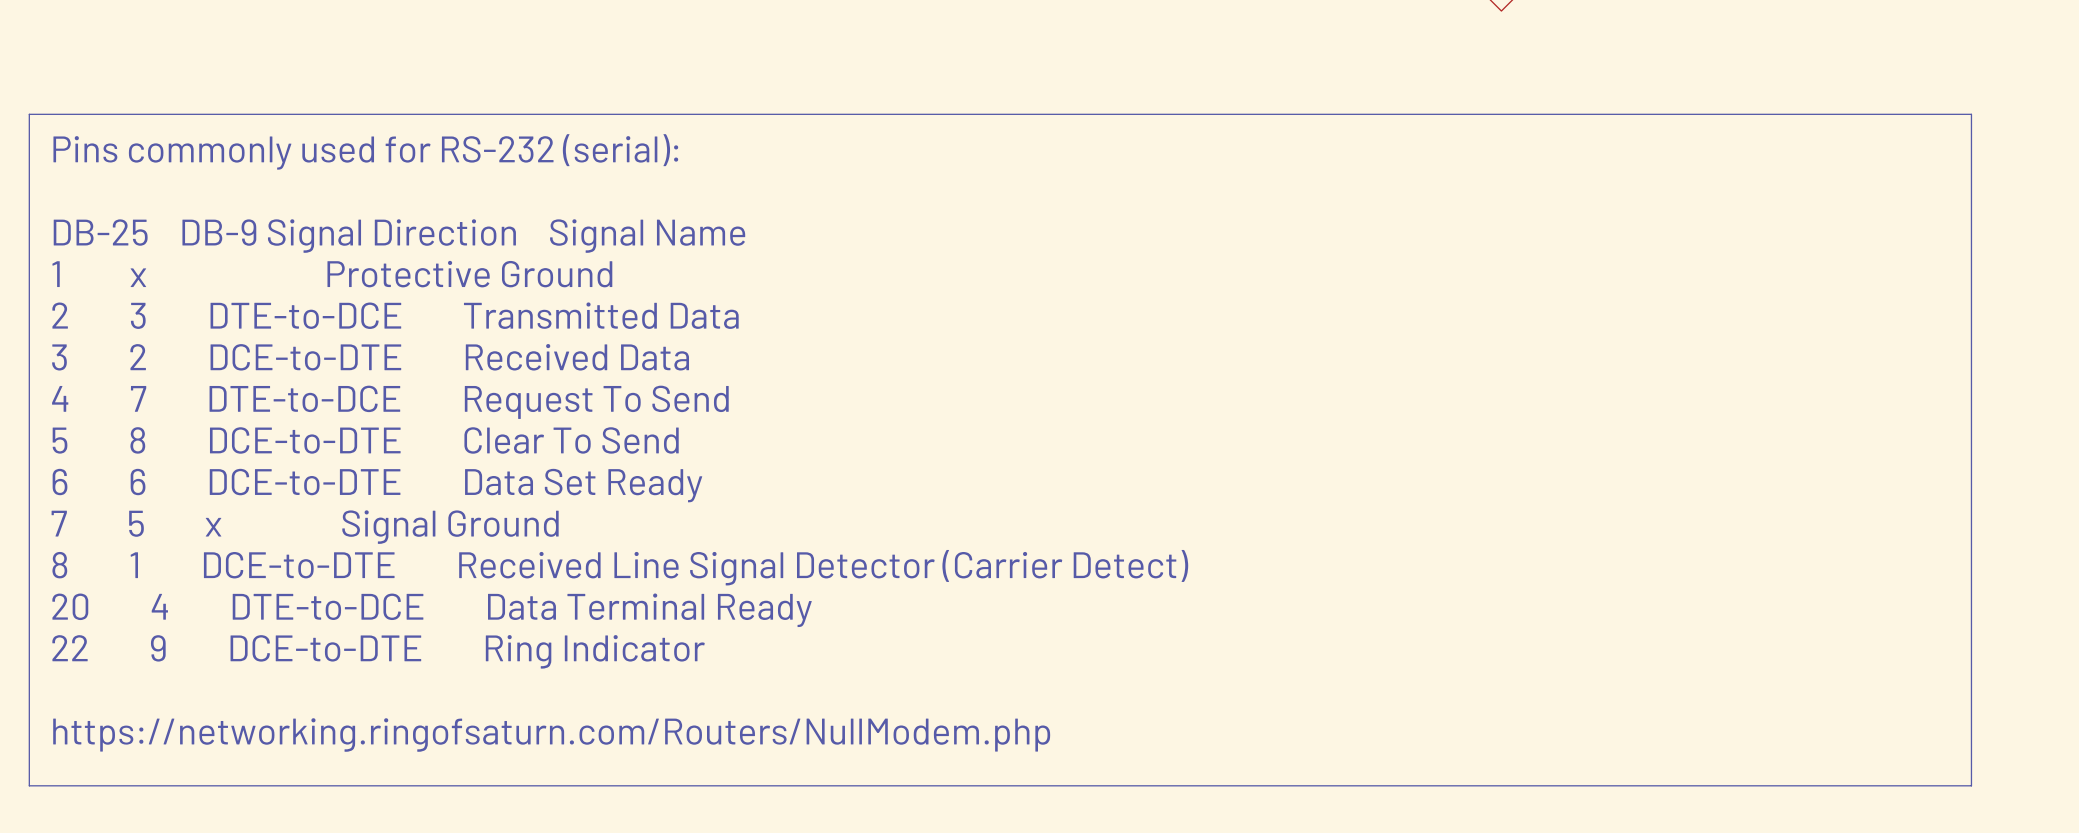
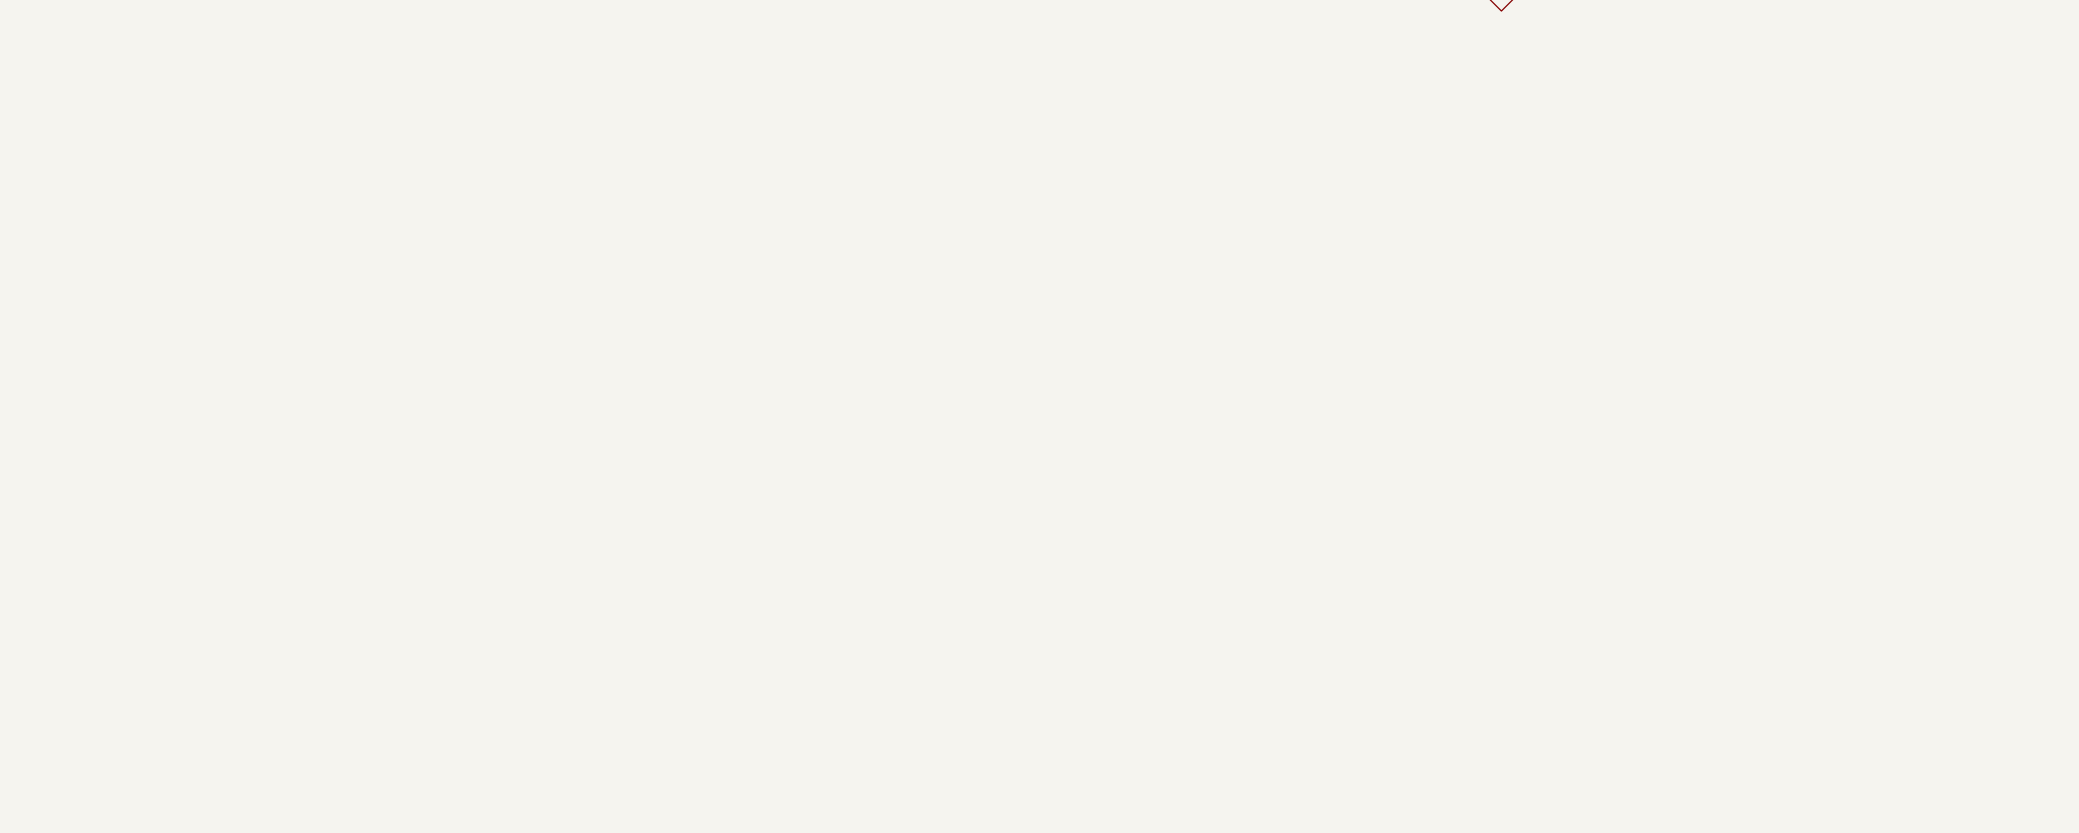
line: (29, 114) (1971, 114) (1971, 785) (29, 785) (29, 114) -> none
text: Pins commonly used for RS-232 (serial): (365, 151) -> none
text: DB-25 DB-9 Signal Direction Signal Name (399, 236) -> none
text: 1 x Protective Ground (332, 274) -> none
text: 2 3 DTE-to-DCE Transmitted Data (395, 315) -> none
text: 3 2 DCE-to-DTE Received Data (370, 357) -> none
text: 4 7 DTE-to-DCE Request To Send (390, 402) -> none
text: 5 8 DCE-to-DTE Clear To Send (365, 440) -> none
text: 6 6 DCE-to-DTE Data Set Ready (377, 485) -> none
text: 7 5 x Signal Ground (305, 527) -> none
text: 8 1 DCE-to-DTE Received Line Signal Detector (Carrier Detect) (620, 567) -> none
text: 20 4 DTE-to-DCE Data Terminal Ready (432, 610) -> none
text: 22 9 DCE-to-DTE Ring Indicator (378, 651) -> none
text: https://networking.ringofsaturn.com/Routers/NullModem.php (551, 735) -> none

